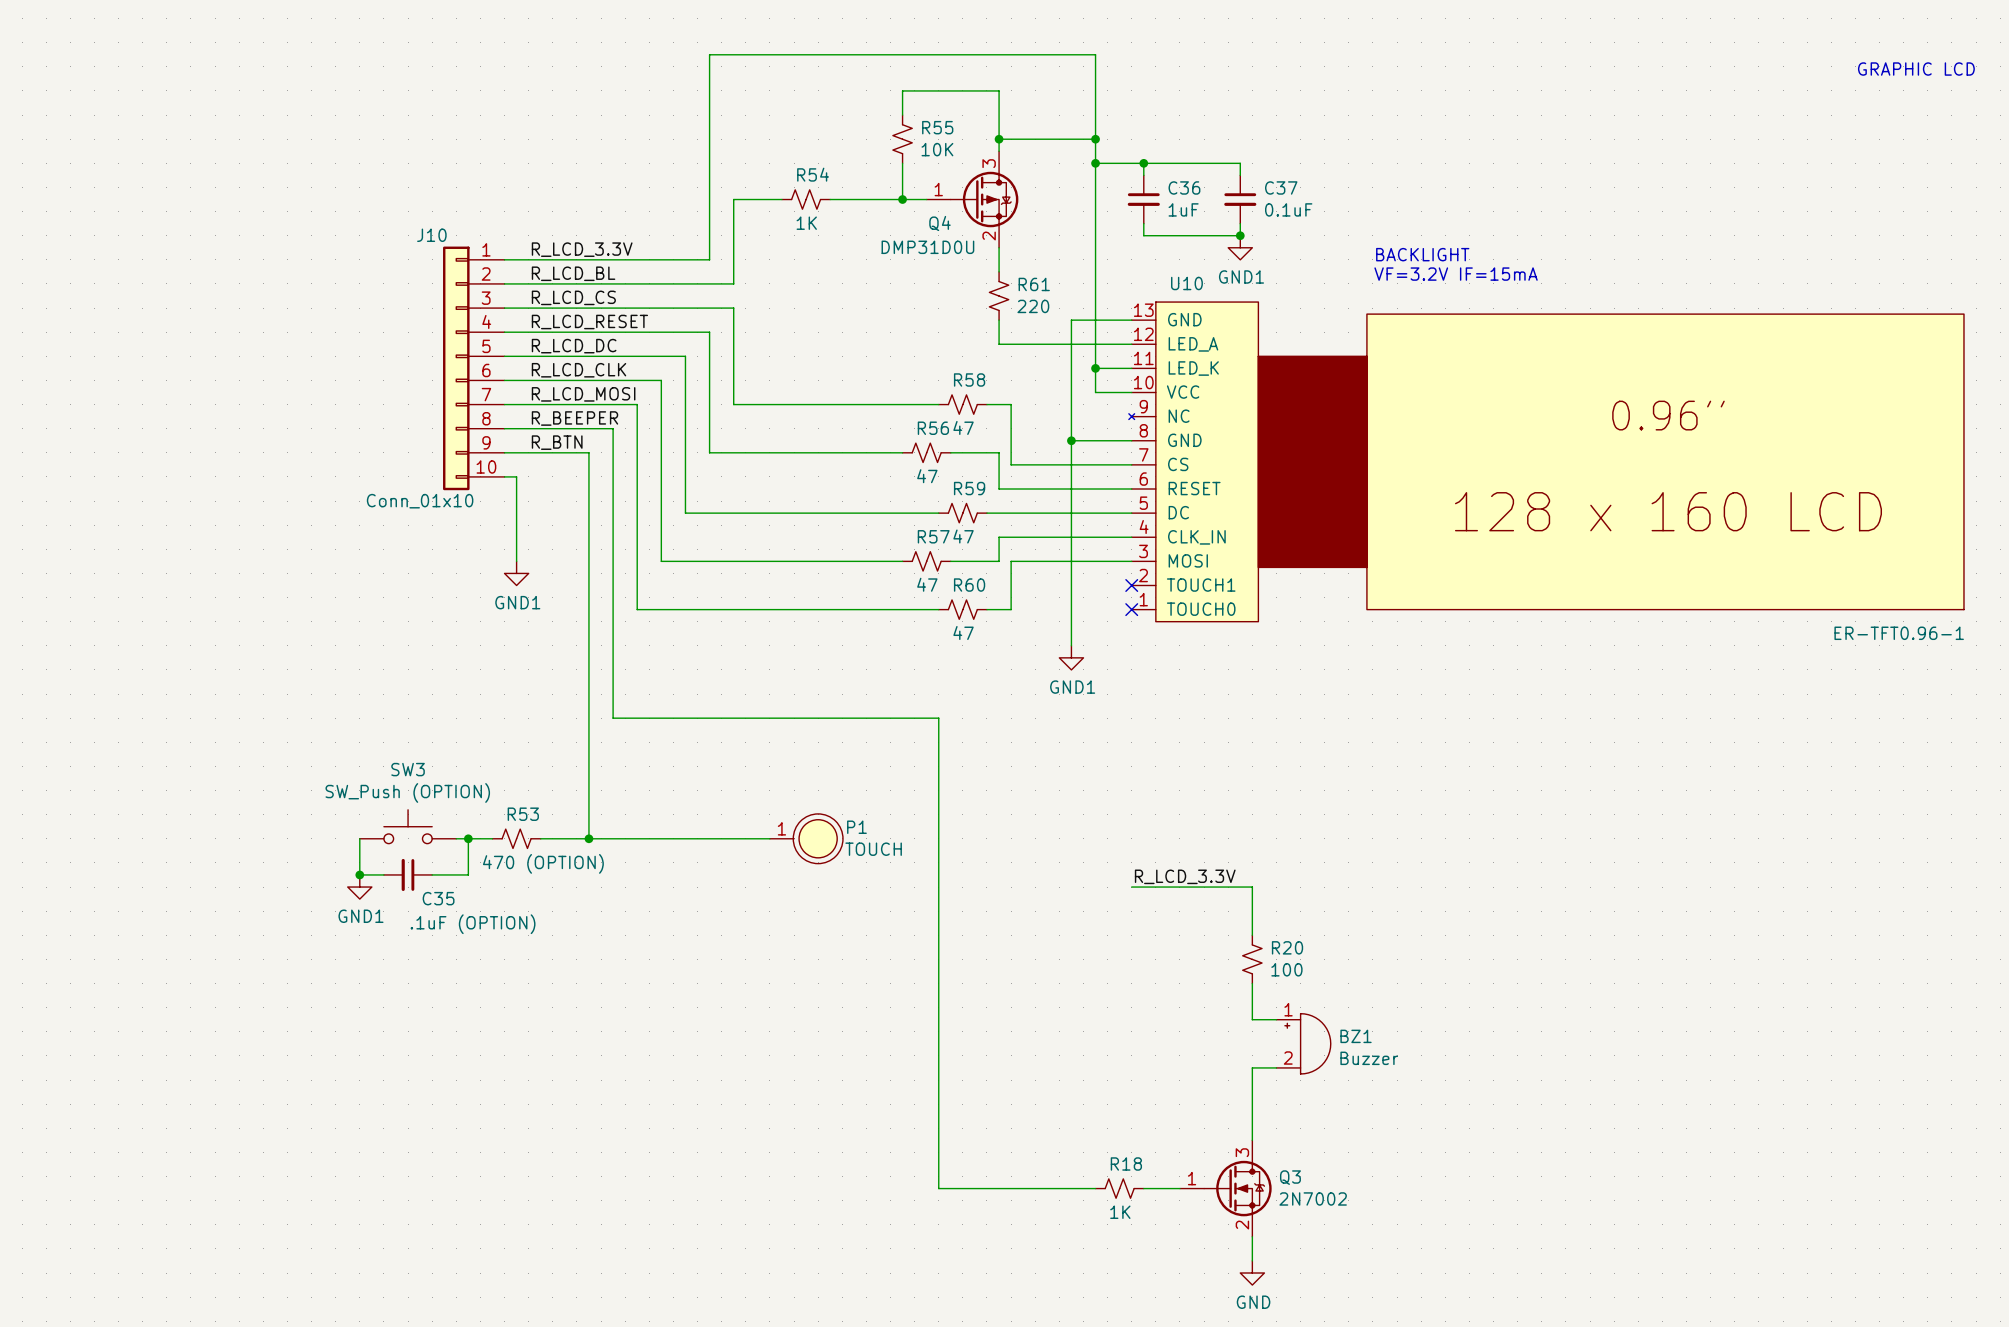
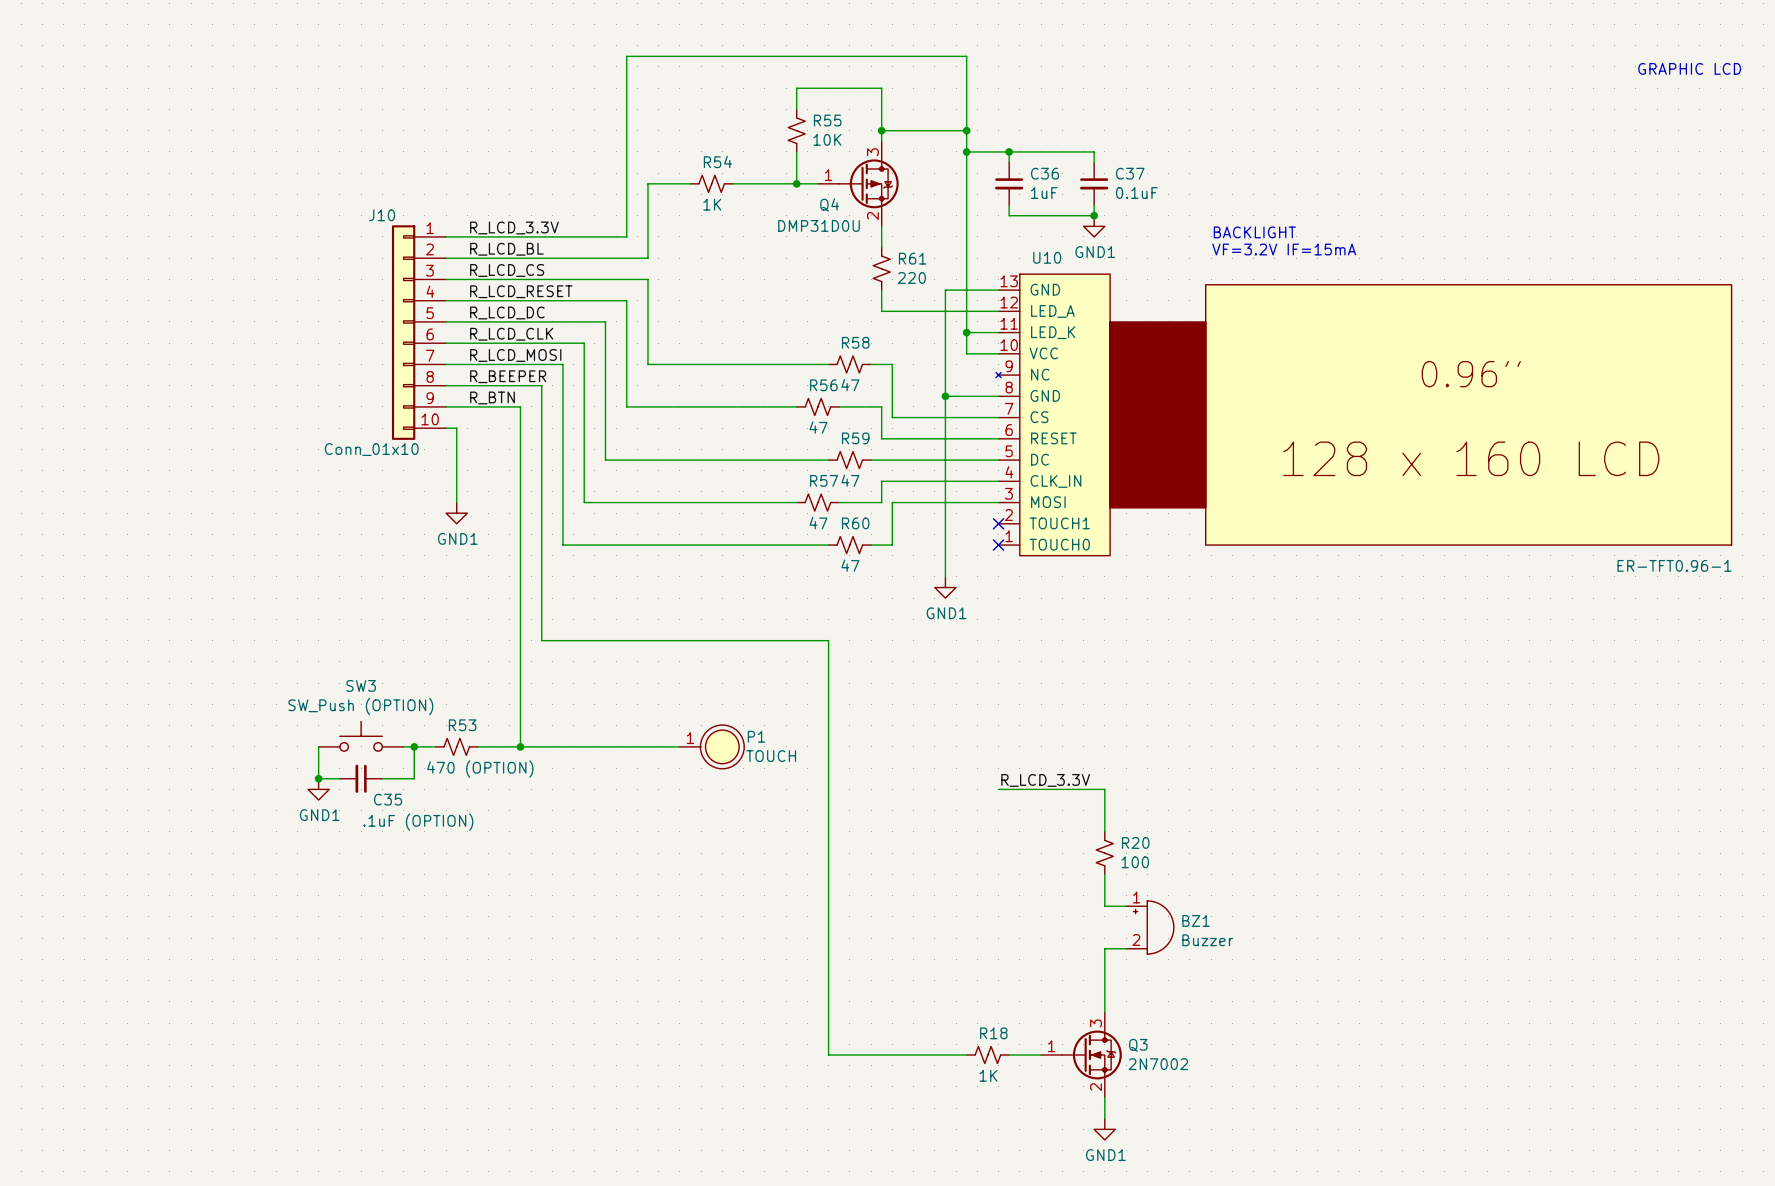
power symbol: GND (1252, 1273) -> GND1 (1104, 1129)

